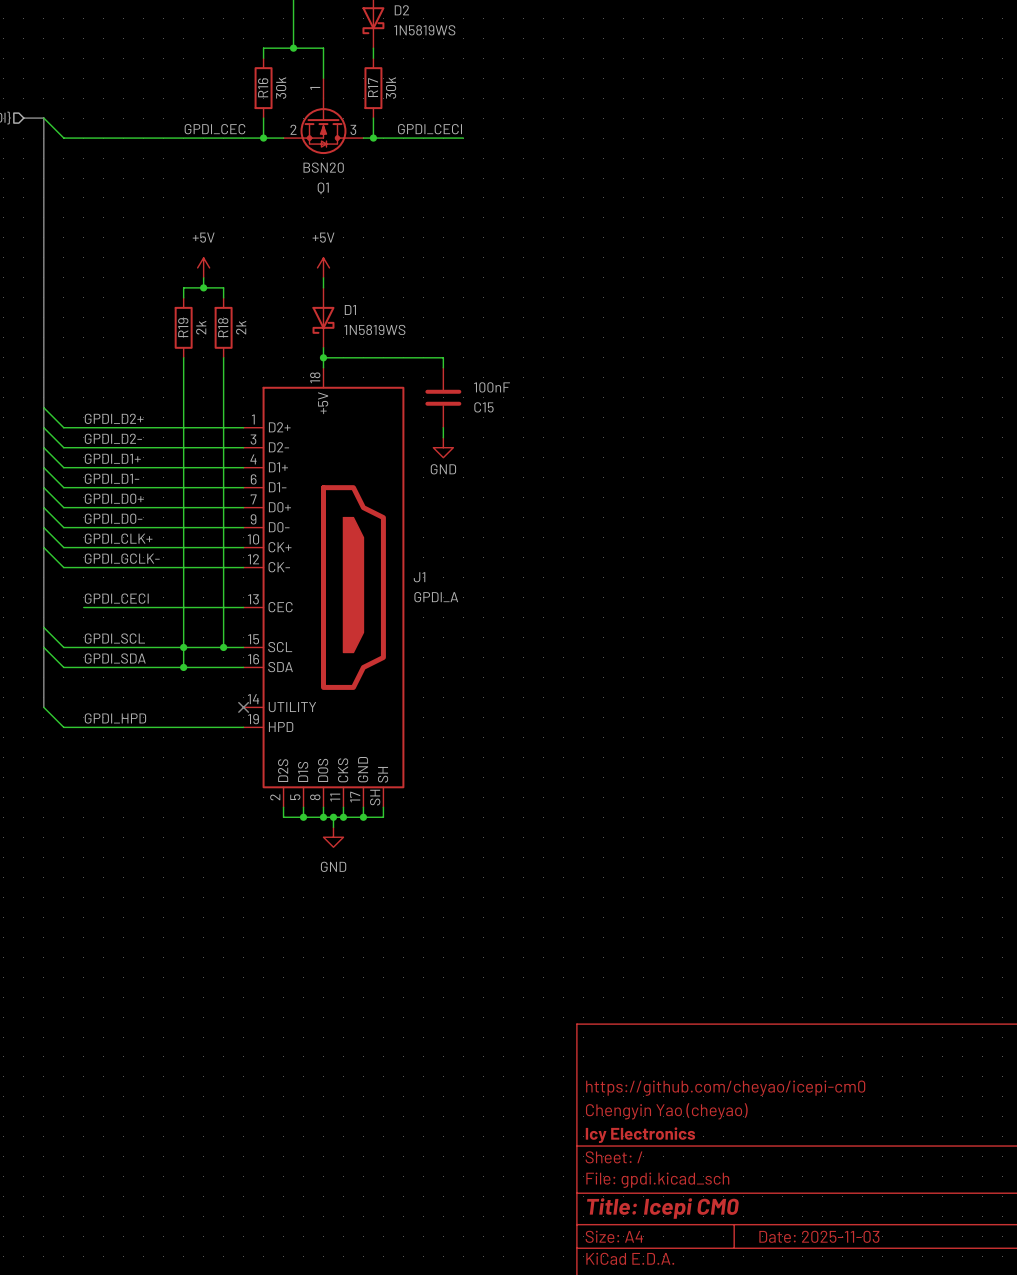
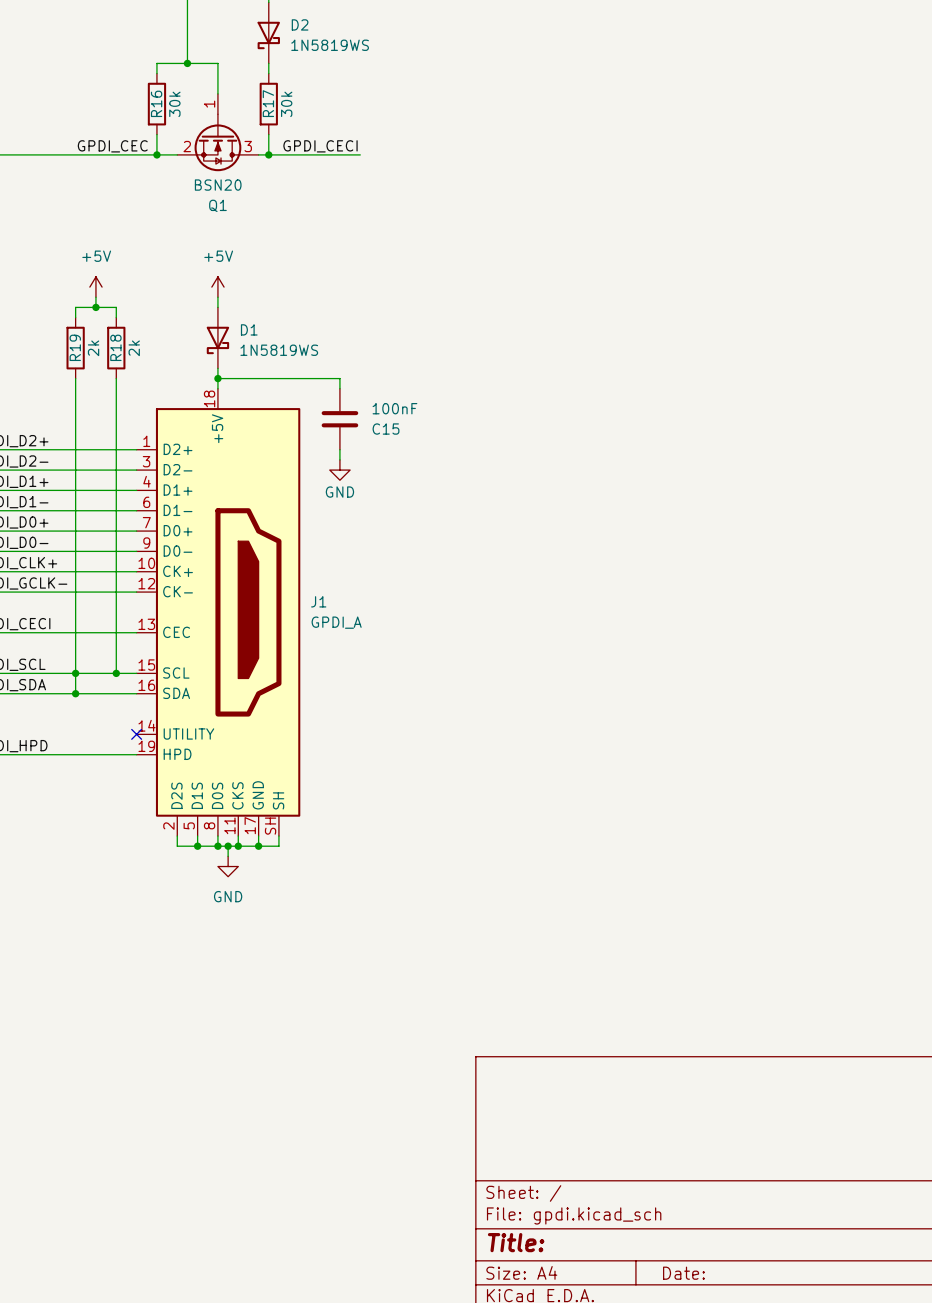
title block: https://github.com/cheyao/icepi-cm0 (725, 1088) -> none
title block: Chengyin Yao (cheyao) (666, 1111) -> none
title block: Icy Electronics (640, 1135) -> none
title block: Title: Icepi CM0 (662, 1208) -> Title: (516, 1242)
title block: Date: 2025-11-03 (819, 1236) -> Date: (683, 1273)

